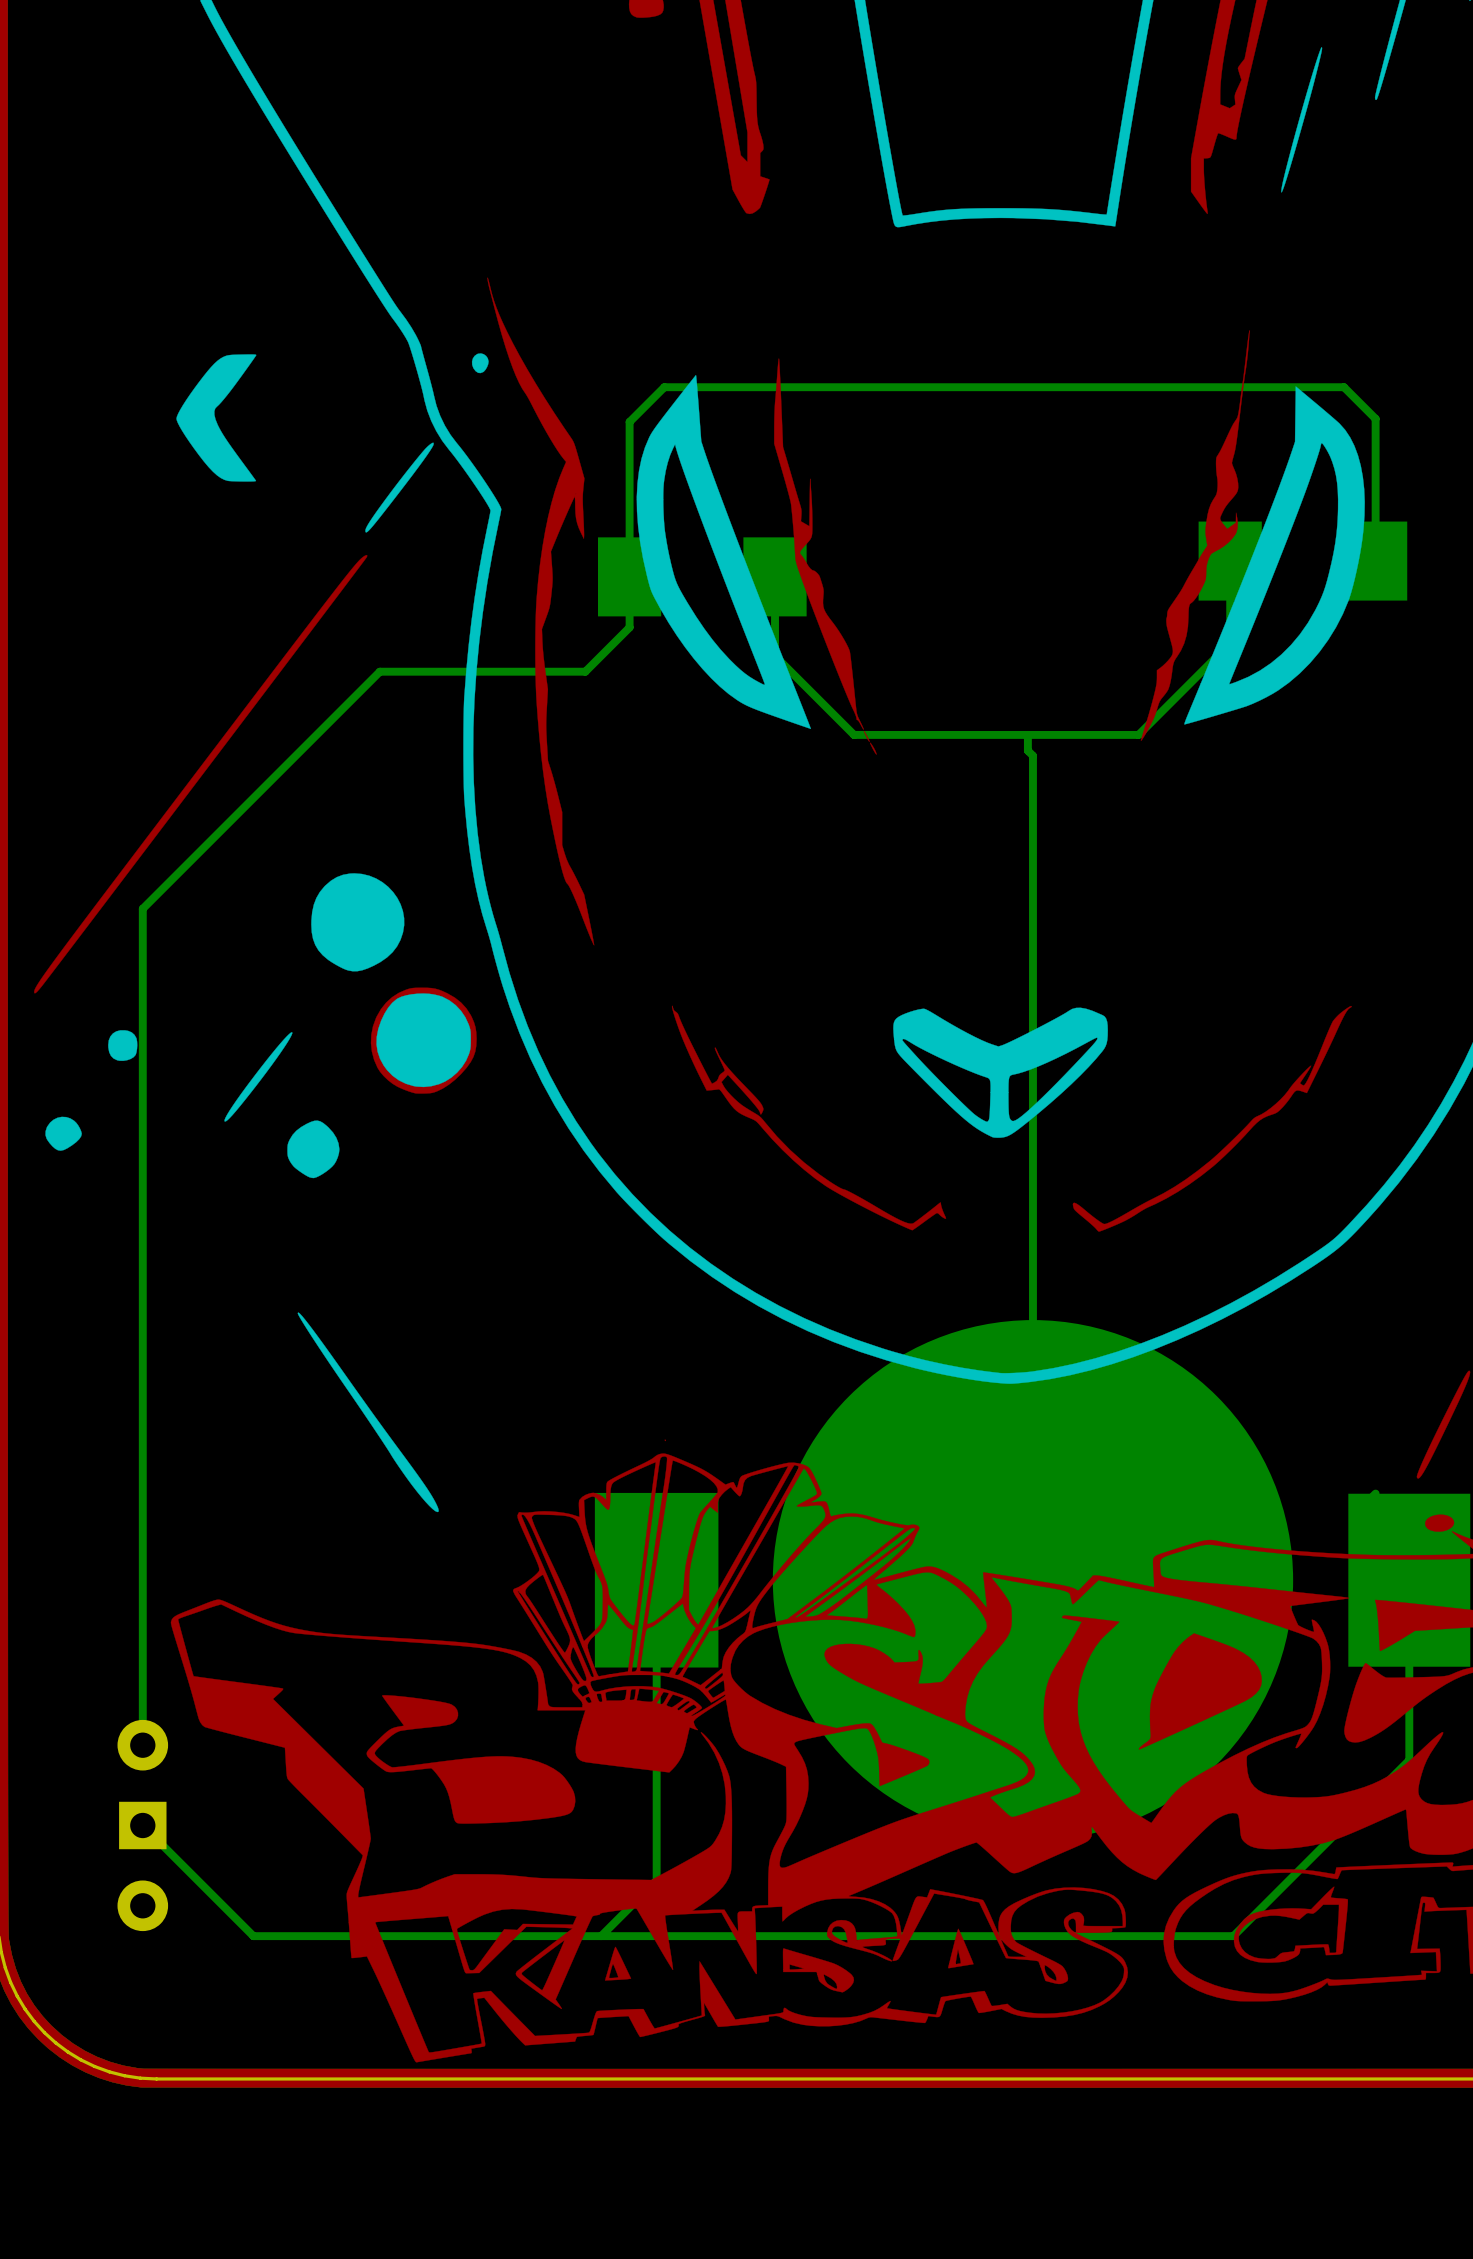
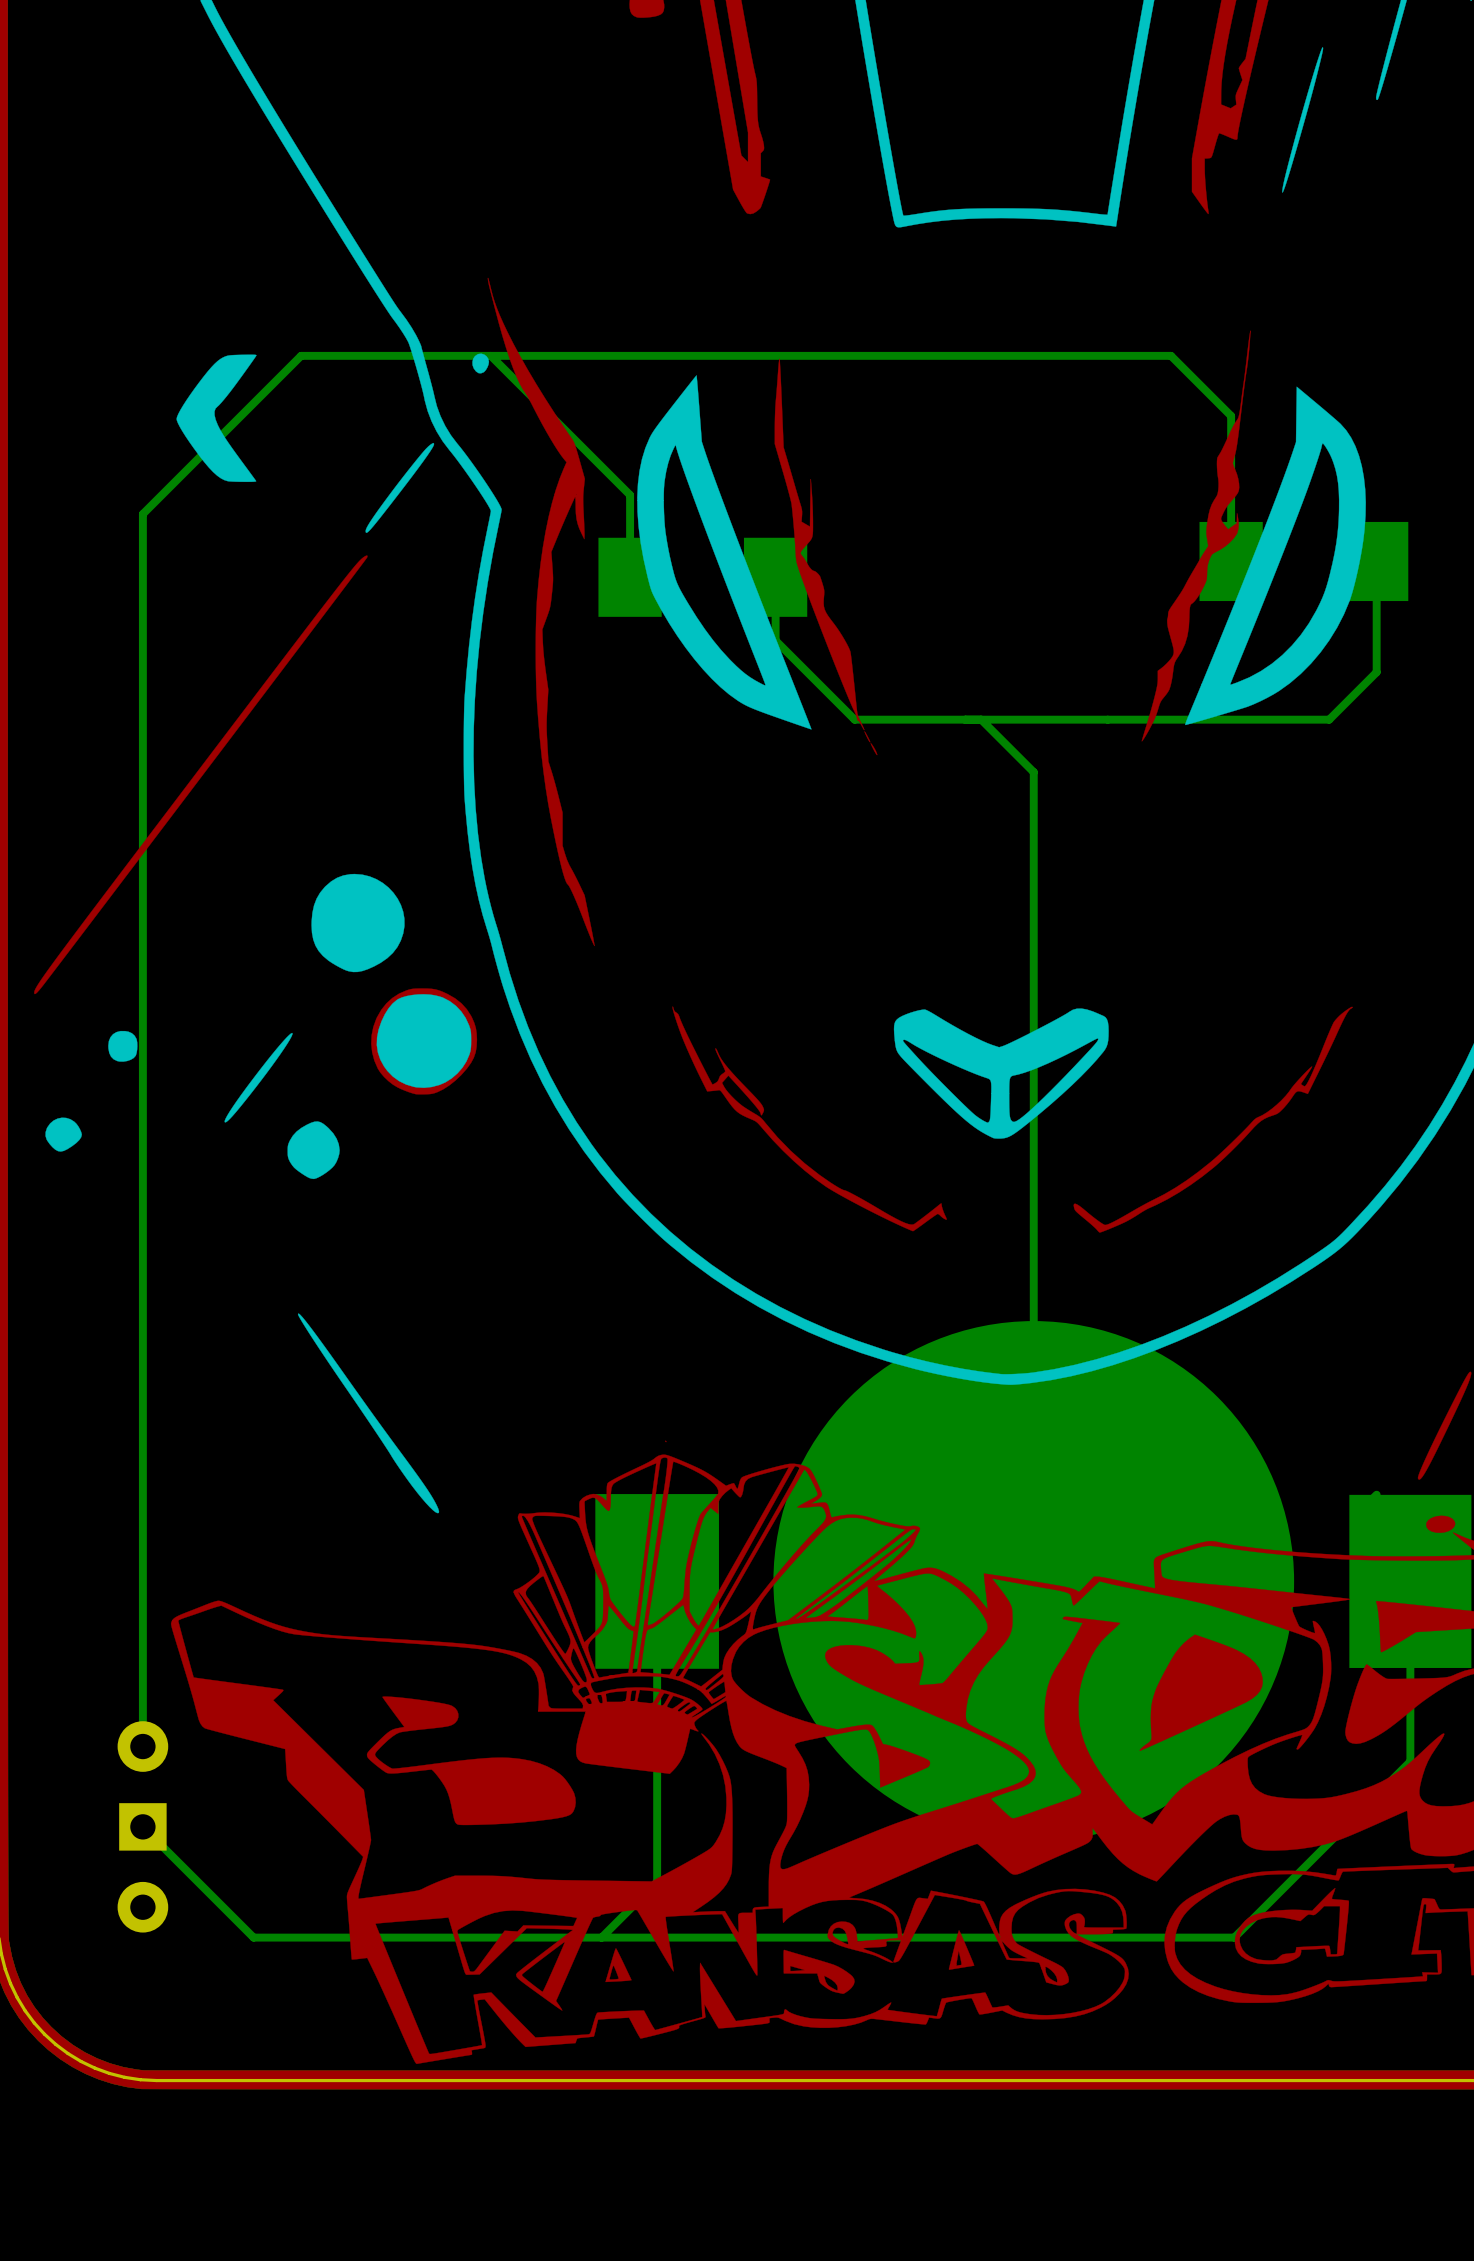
bottom track: (629, 494) (629, 421) (664, 387) (1344, 387) (1375, 418) (1375, 561) -> (630, 495) (490, 355)
bottom track: (1230, 561) (1230, 643) (1138, 734) (854, 734) (775, 655) (775, 640) -> (1376, 561) (1376, 672) (1329, 719) (854, 719) (775, 640)
bottom track: (629, 576) (629, 627) (585, 671) (379, 671) (142, 908) -> (1231, 561) (1231, 415) (1171, 355) (301, 355) (142, 514) (142, 909)
bottom track: (1027, 734) (1027, 750) (1032, 755) (1032, 771) -> (981, 719) (1033, 772)

